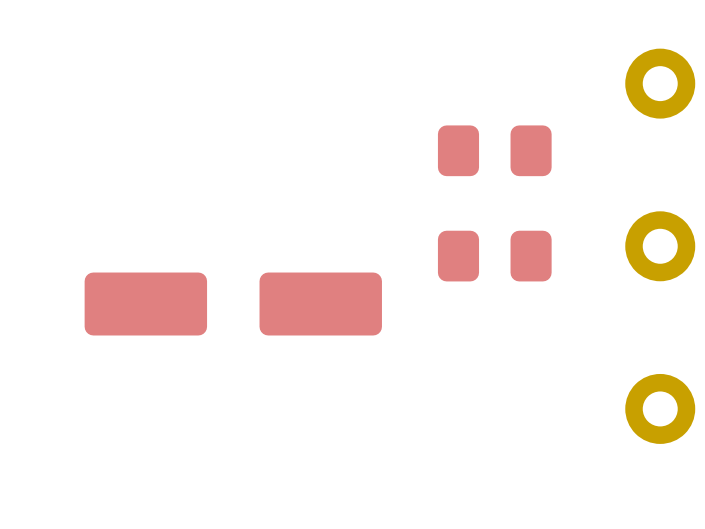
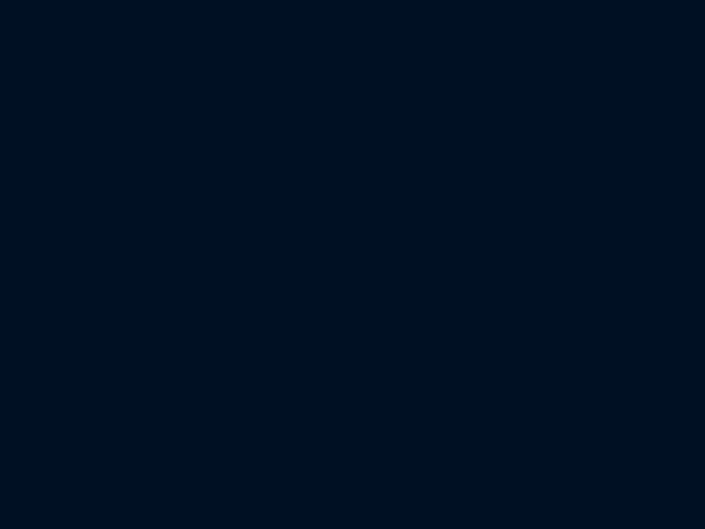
part: (660, 83) -> none
part: (494, 150) -> none
part: (660, 246) -> none
part: (494, 256) -> none
part: (233, 304) -> none
part: (660, 408) -> none

